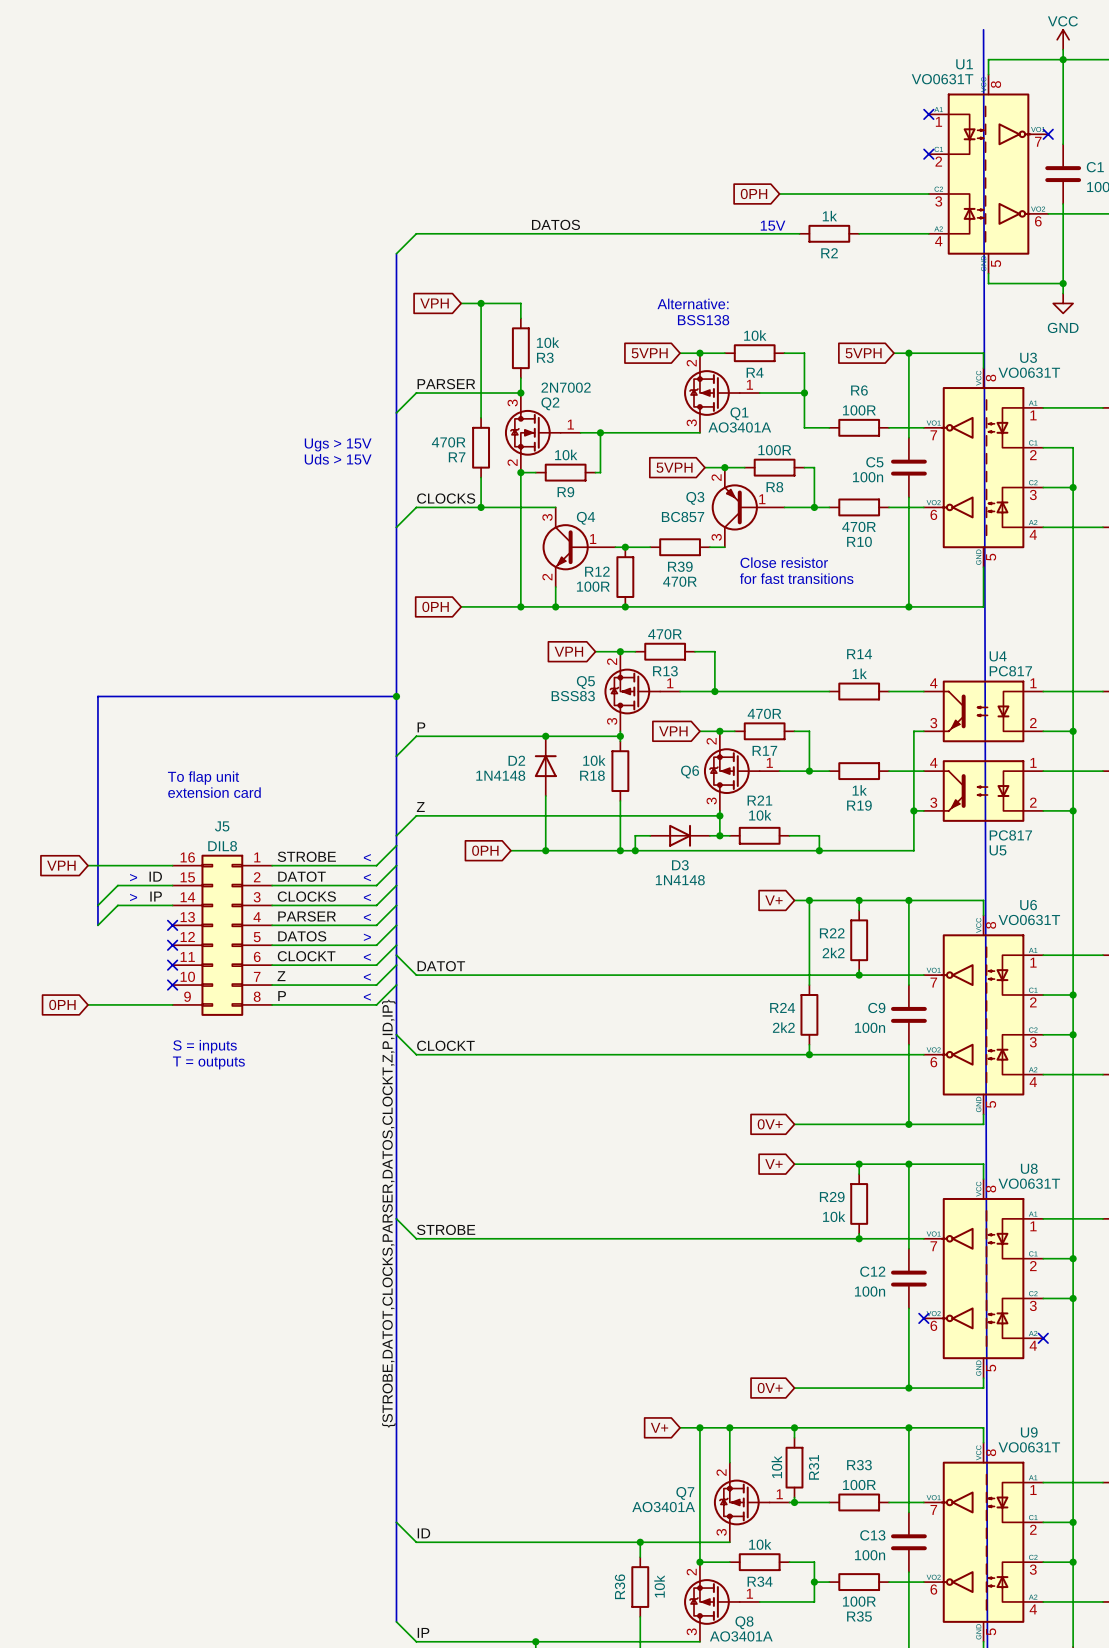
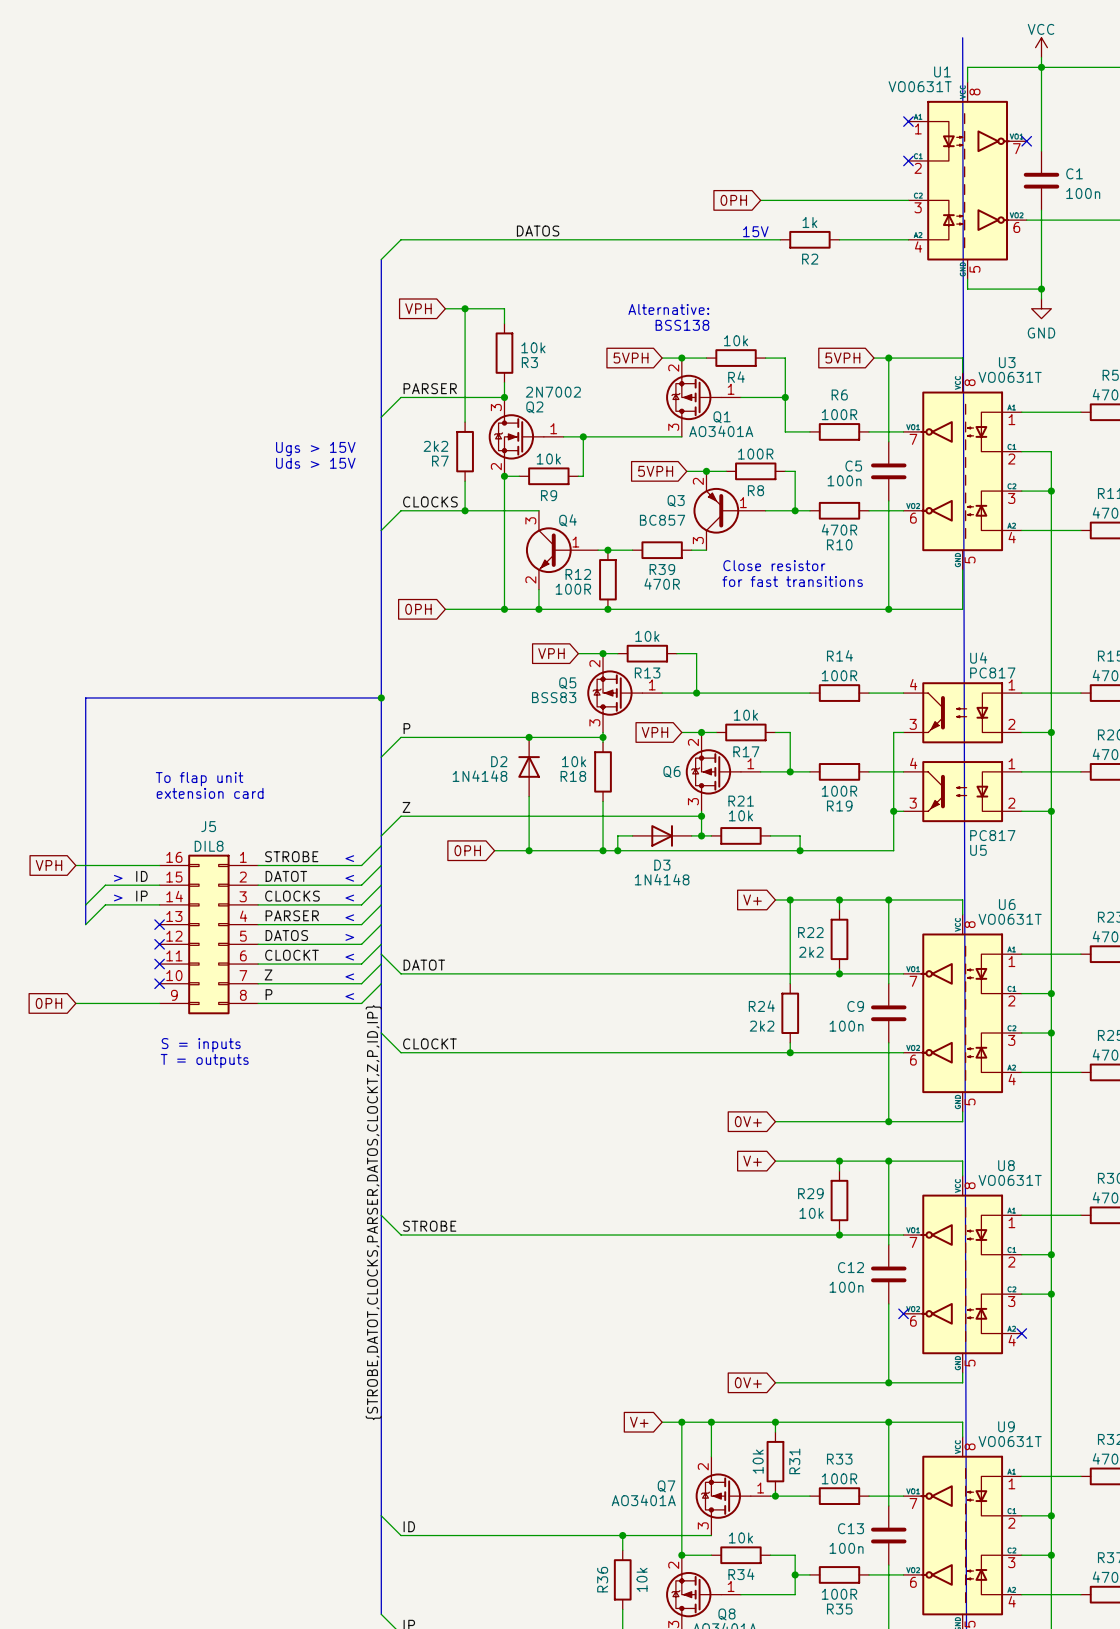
R7 value: 470R (448, 442) -> 2k2 (435, 446)
R13 value: 470R (664, 634) -> 10k (647, 636)
R14 value: 1k (859, 673) -> 100R (839, 675)
R17 value: 470R (764, 713) -> 10k (745, 715)
R19 value: 1k (859, 790) -> 100R (839, 791)

